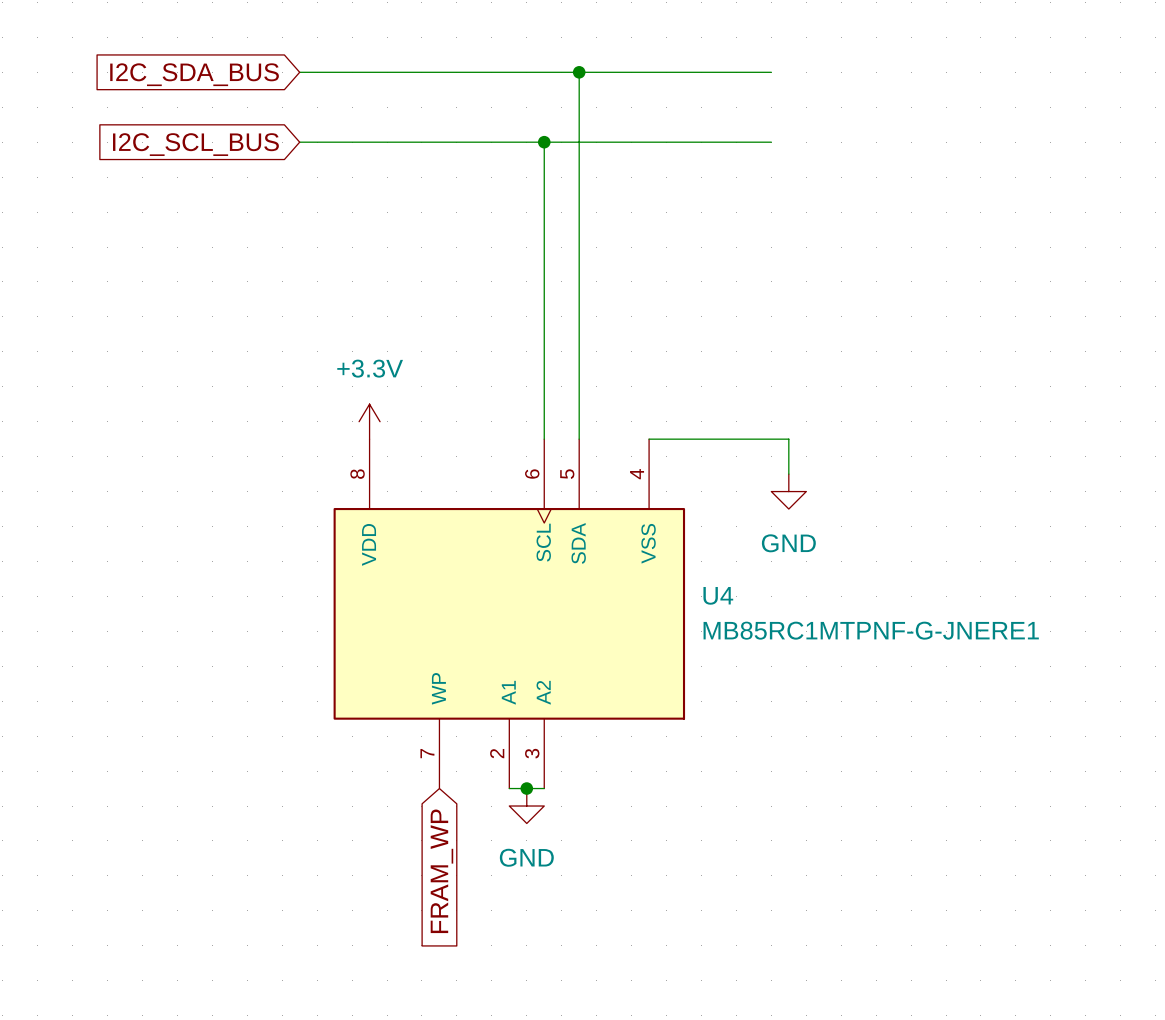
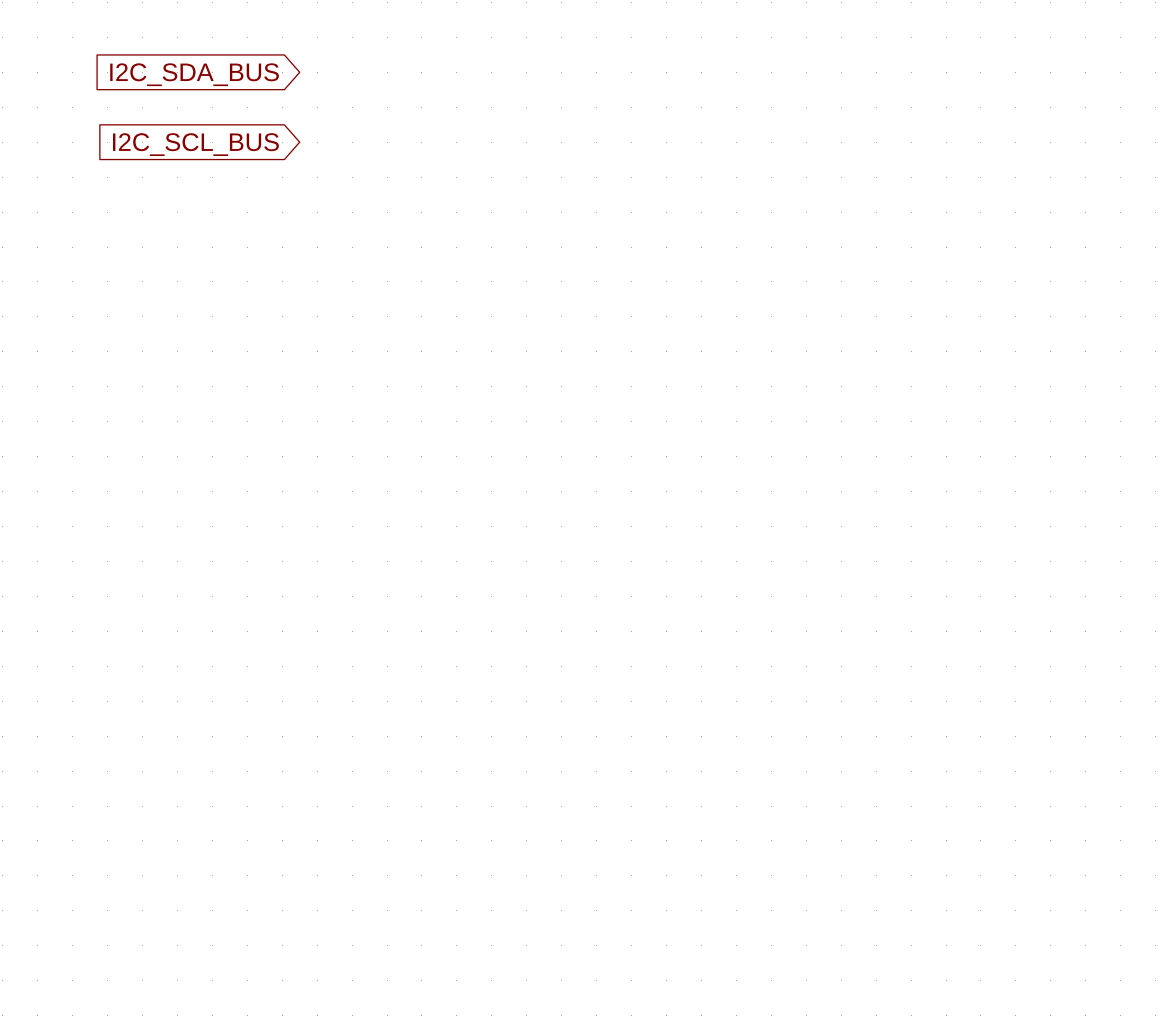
wire: (299, 72) (771, 72) -> none
wire: (579, 72) (579, 439) -> none
junction: (579, 72) -> none
wire: (299, 142) (771, 142) -> none
wire: (544, 142) (544, 439) -> none
junction: (544, 142) -> none
power symbol: +3.3V (369, 421) -> none
wire: (649, 439) (788, 439) (788, 474) -> none
power symbol: GND (788, 491) -> none
U4: MB85RC1MTPNF-G-JNERE1 (509, 613) -> none
wire: (509, 788) (544, 788) -> none
junction: (526, 788) -> none
power symbol: GND (526, 806) -> none
global label: FRAM_WP (441, 871) -> none

